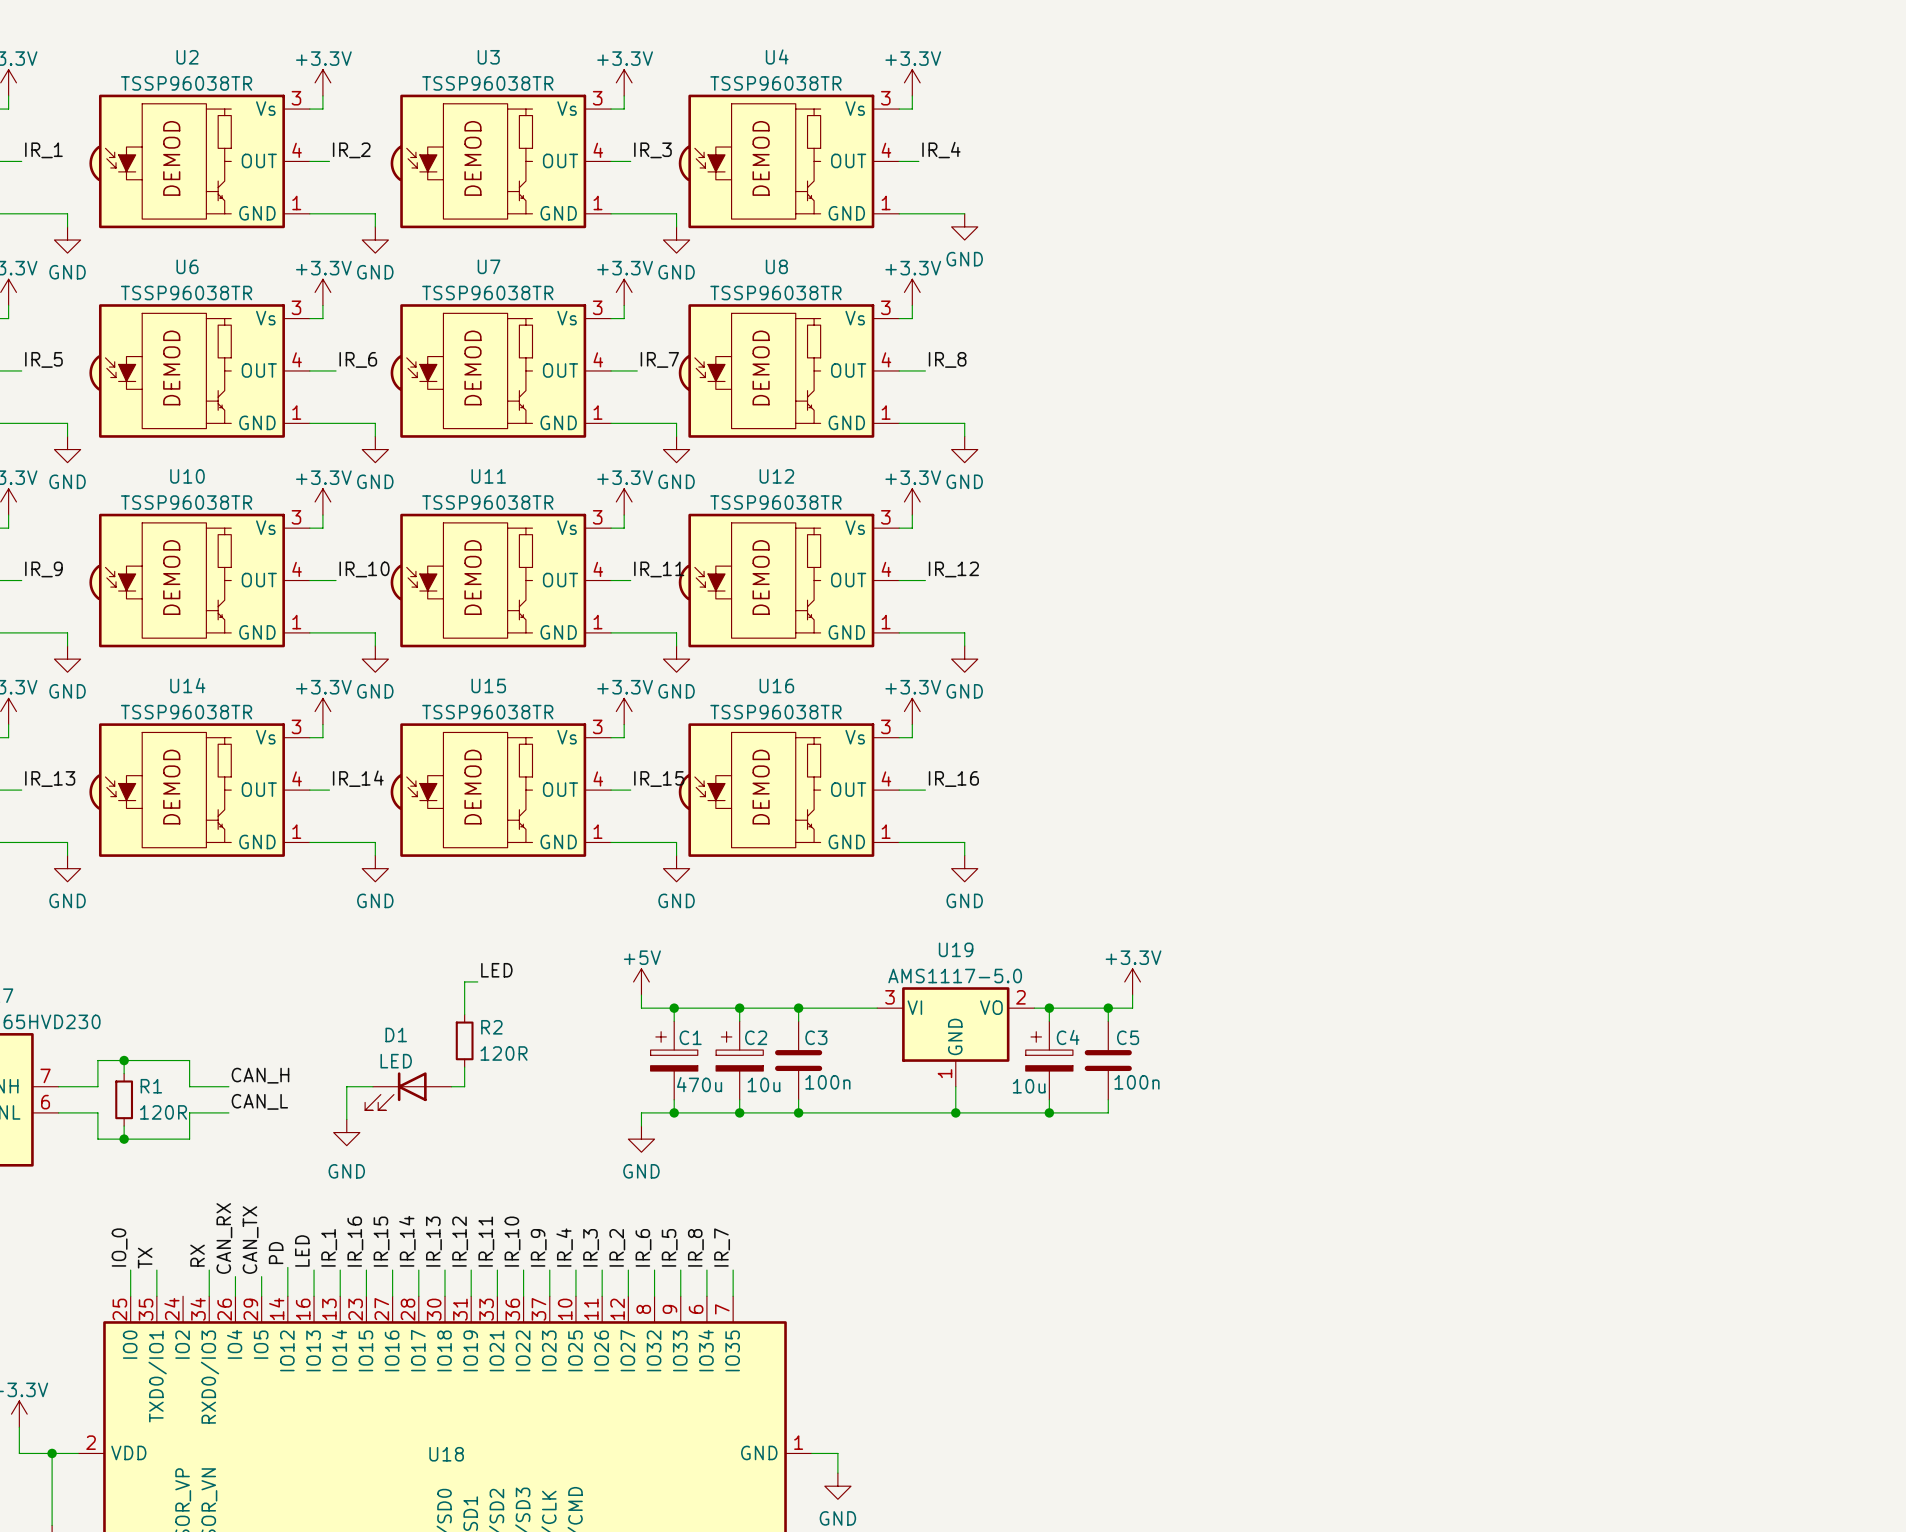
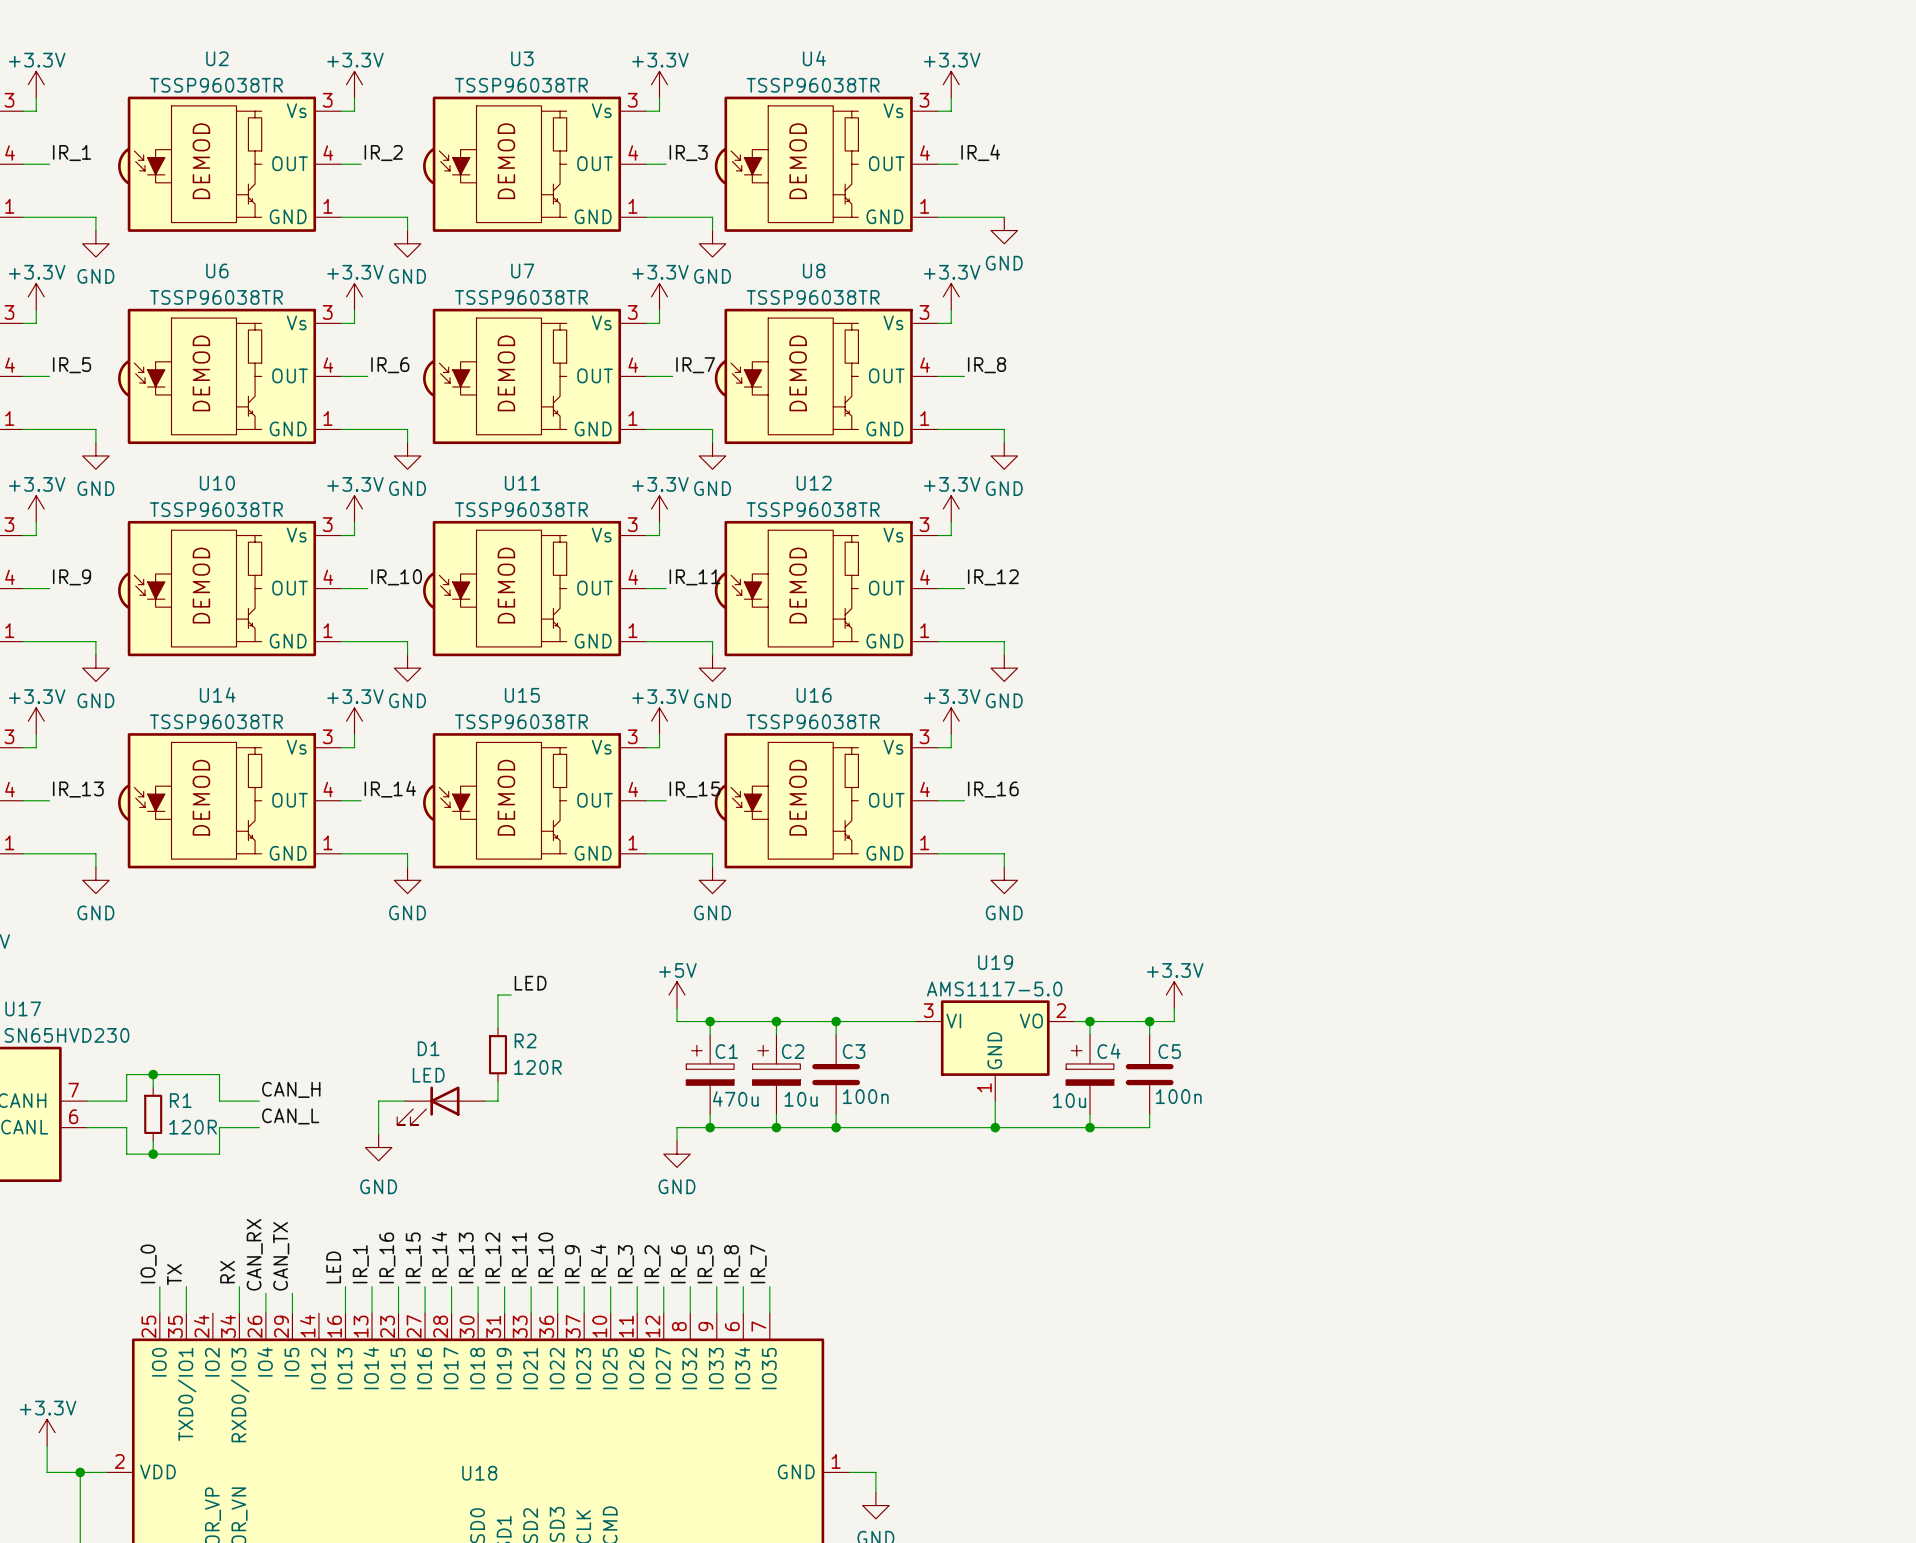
label: PD (276, 1253) -> none
wire: (287, 1267) (287, 1296) -> none

